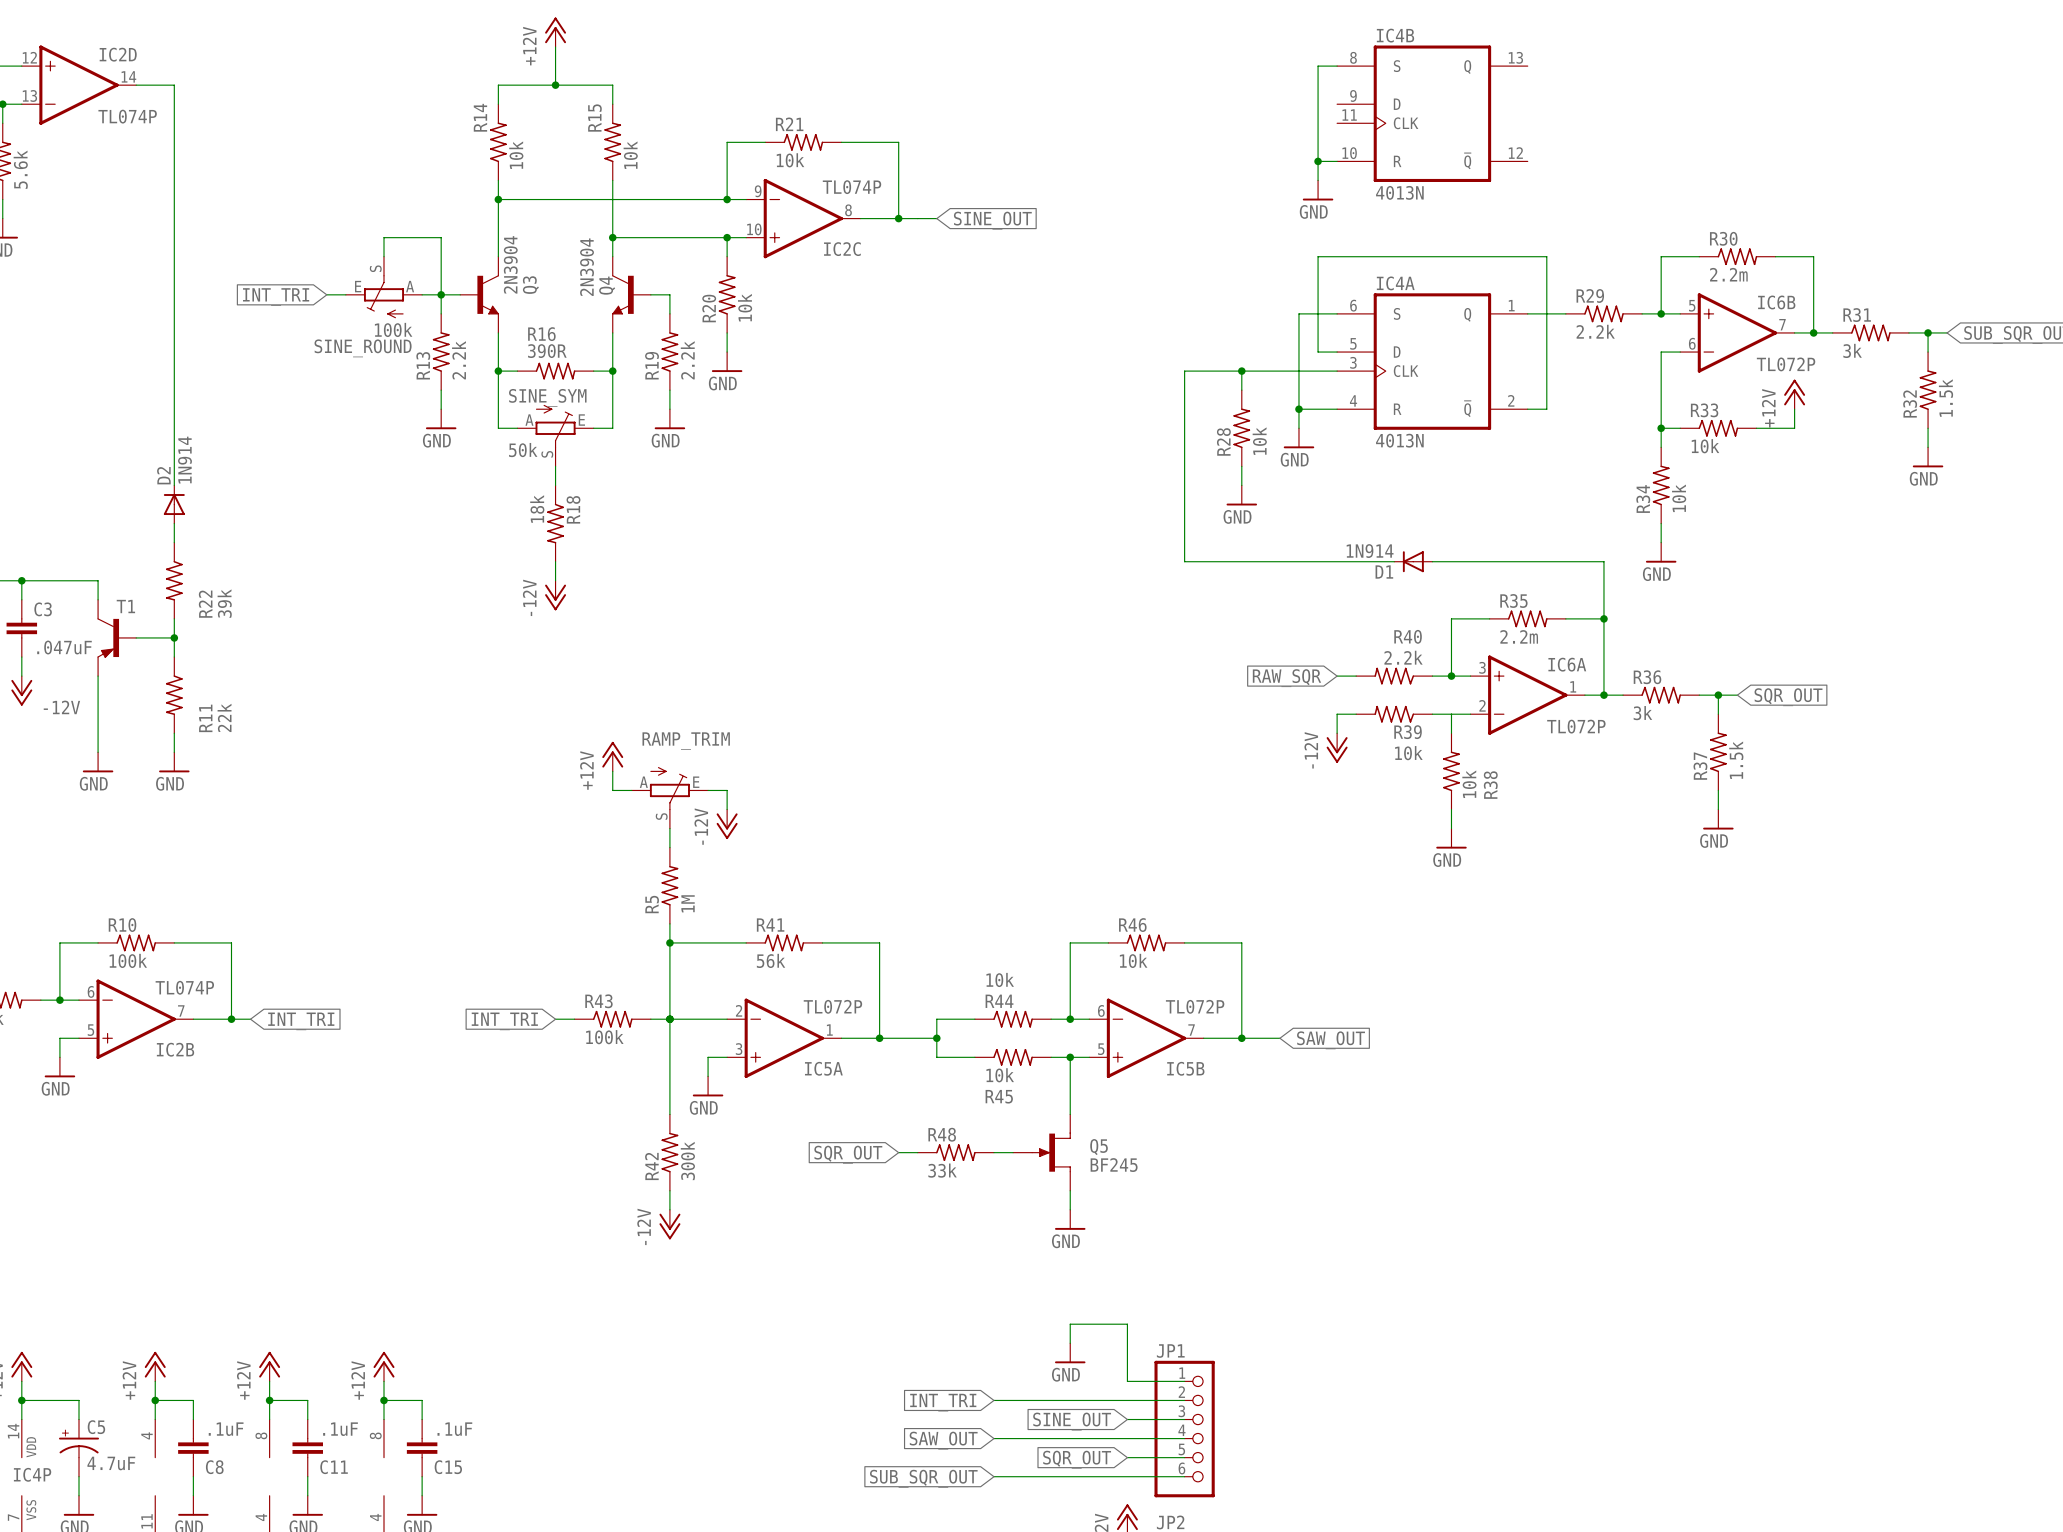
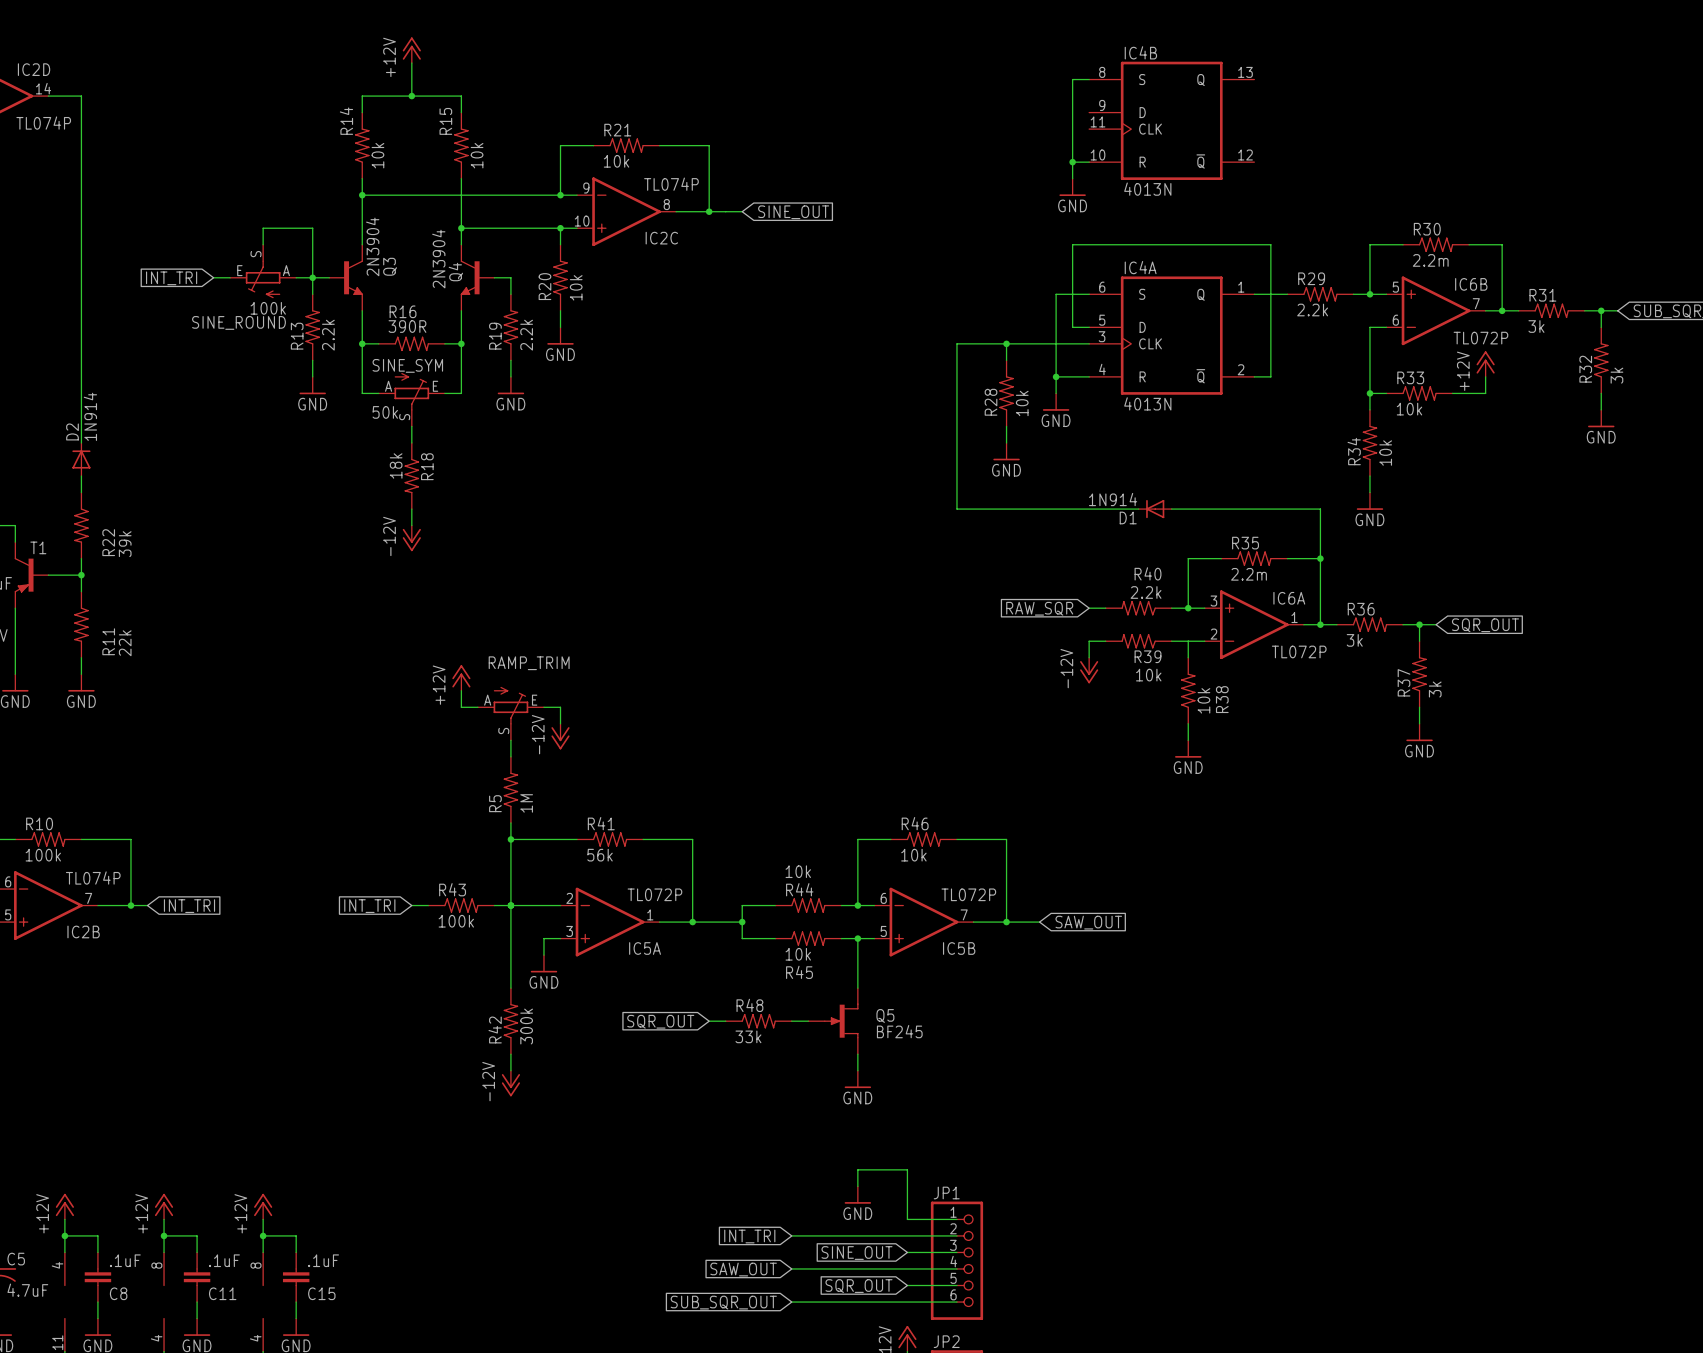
R32 value: 1.5k (1946, 398) -> 3k (1616, 375)
R37 value: 1.5k (1736, 760) -> 3k (1435, 689)

